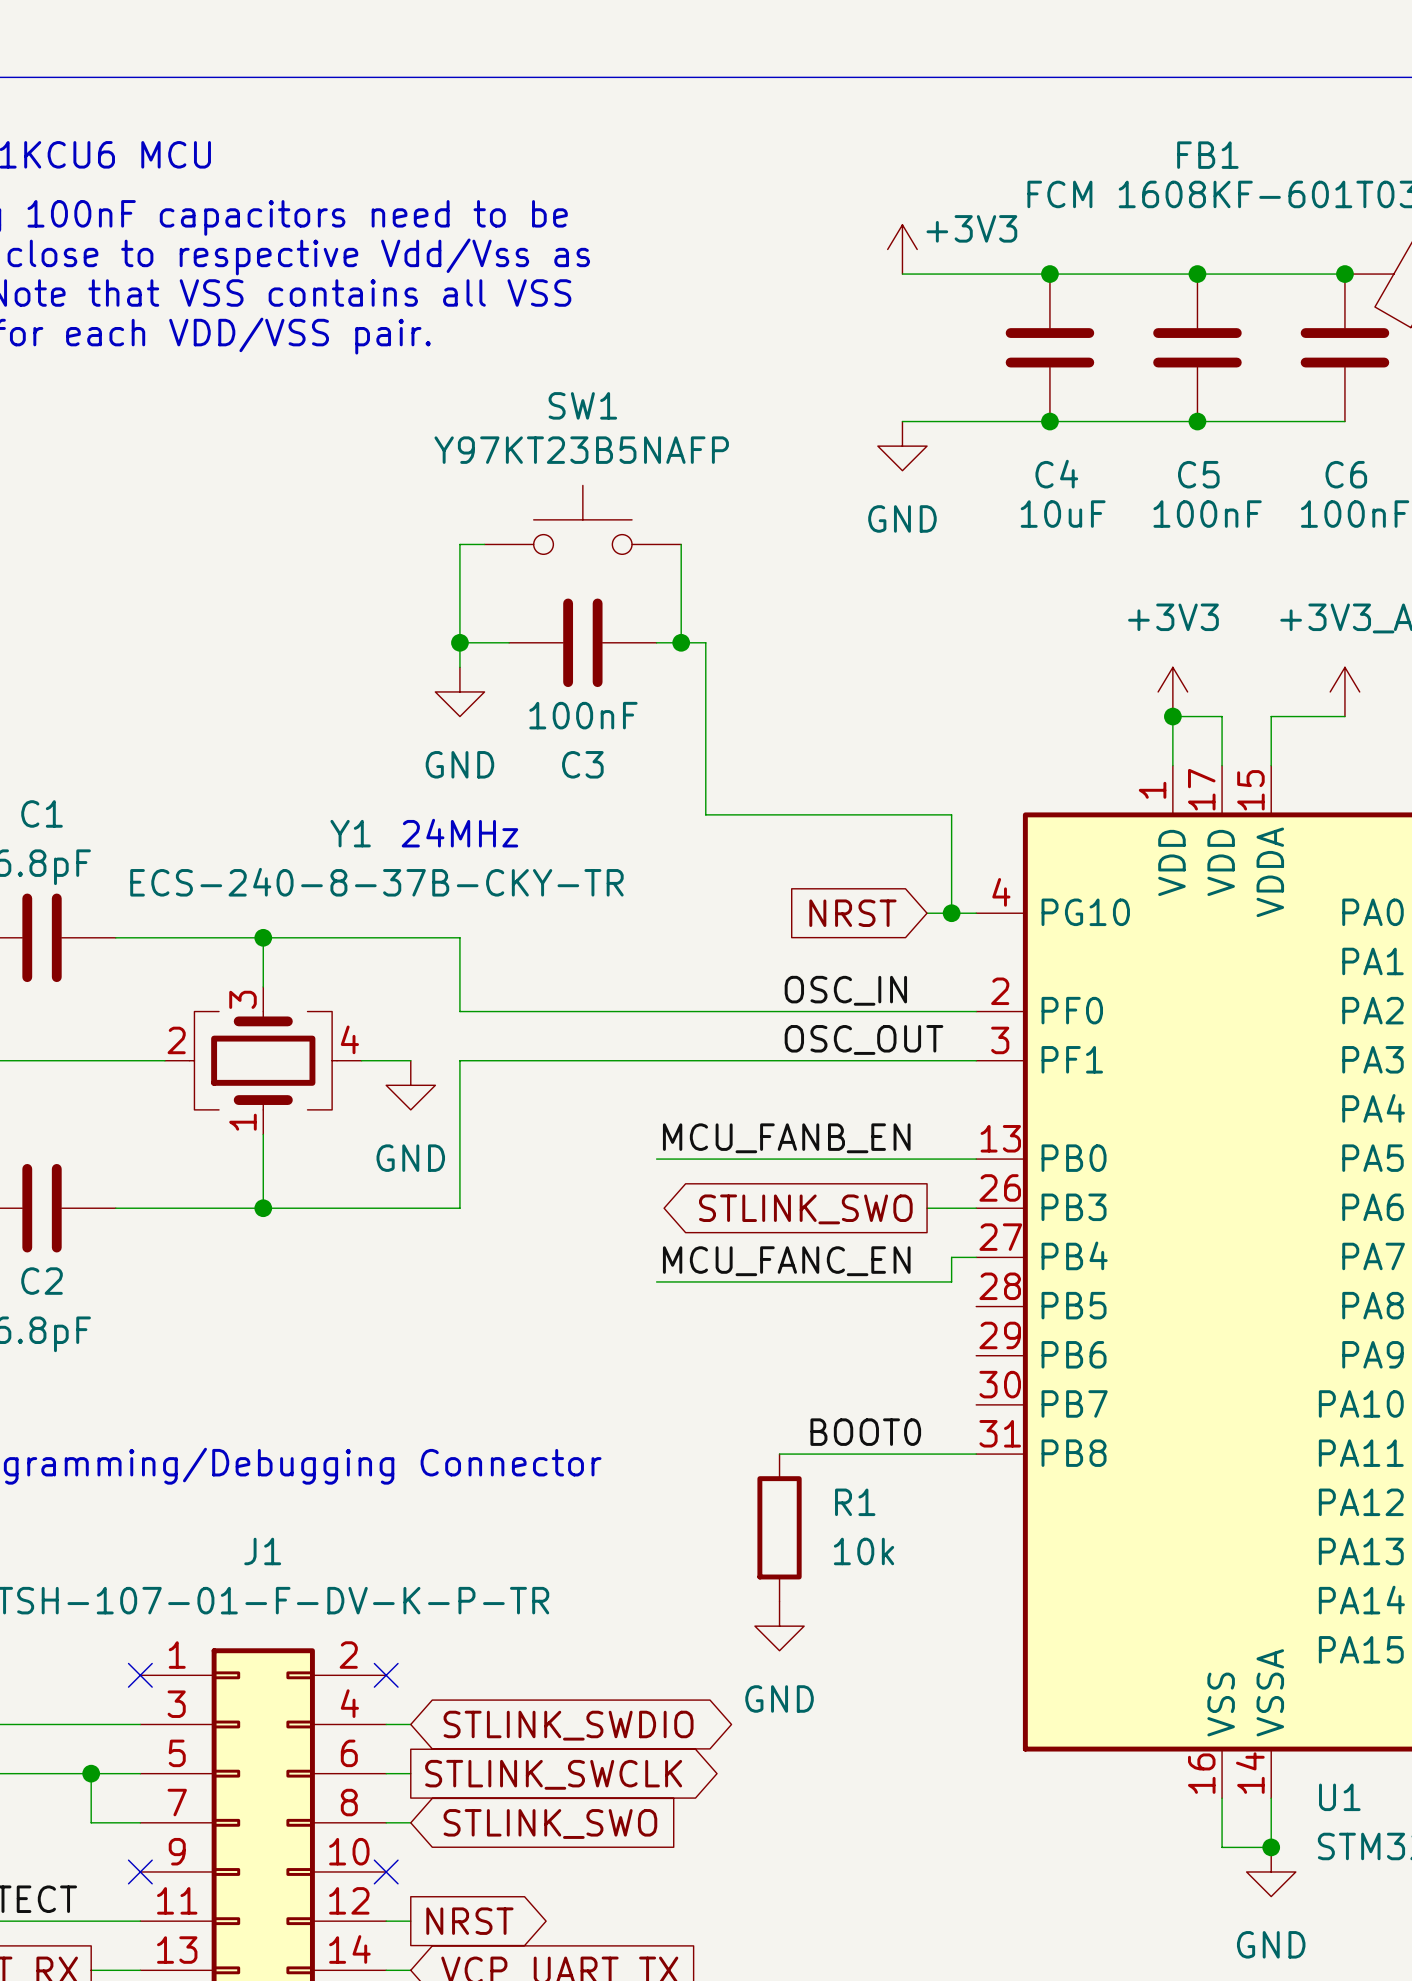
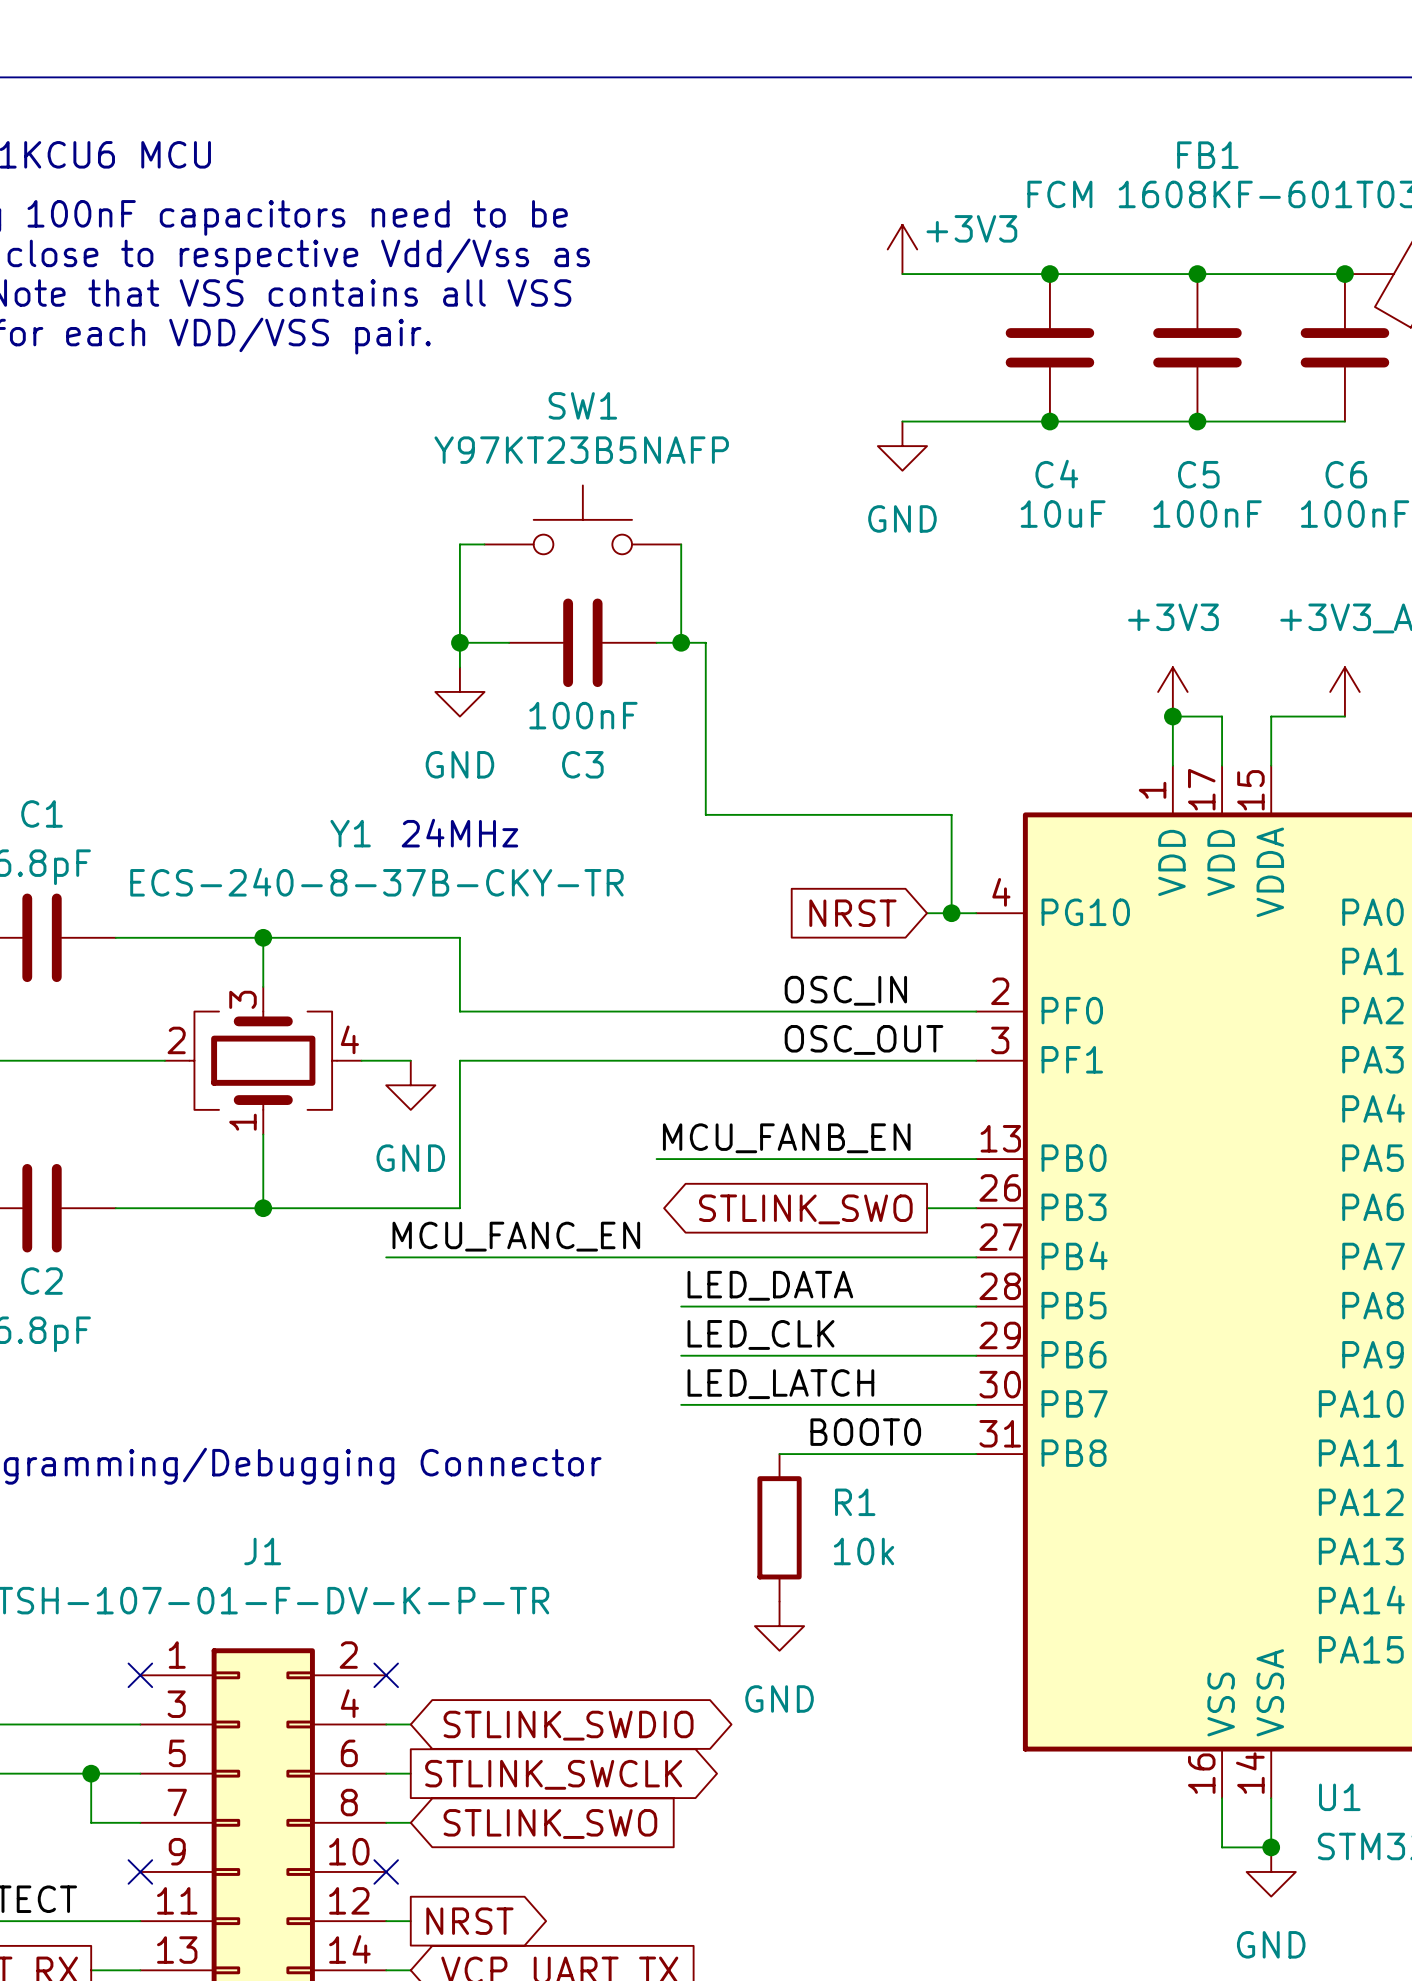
wire: (951, 1257) (951, 1281) (656, 1281) -> (951, 1257) (386, 1257)
label position: MCU_FANC_EN (786, 1261) -> MCU_FANC_EN (516, 1236)
label: none -> LED_DATA (770, 1285)
wire: none -> (681, 1306) (976, 1306)
label: none -> LED_CLK (760, 1334)
wire: none -> (681, 1355) (976, 1355)
label: none -> LED_LATCH (780, 1384)
wire: none -> (681, 1404) (976, 1404)

